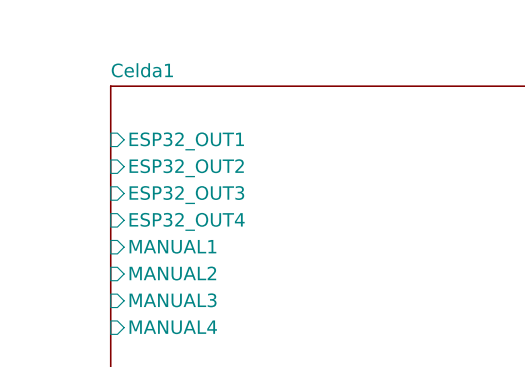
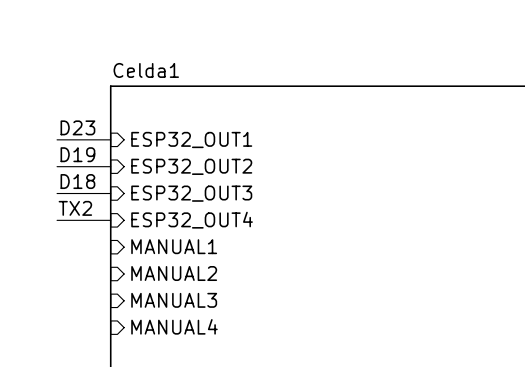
label: none -> D23 (77, 127)
wire: none -> (57, 139) (110, 139)
label: none -> D19 (77, 154)
wire: none -> (57, 166) (110, 166)
label: none -> D18 (77, 181)
wire: none -> (57, 193) (110, 193)
label: none -> TX2 (75, 208)
wire: none -> (57, 220) (110, 220)

